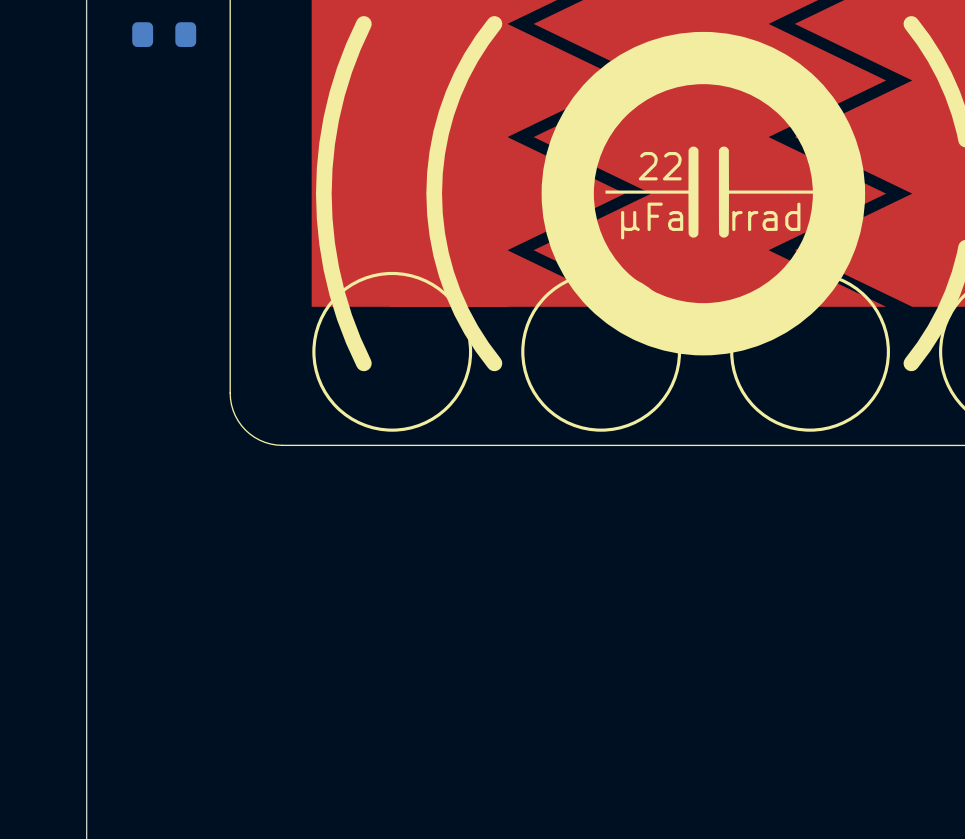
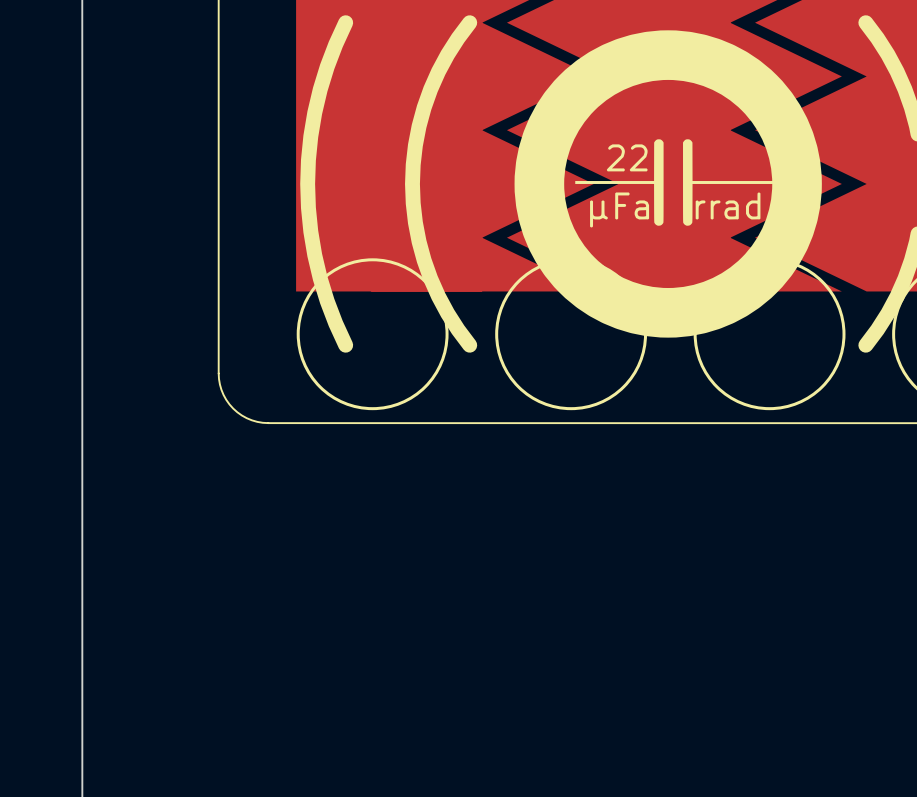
part: (164, 34) -> none

